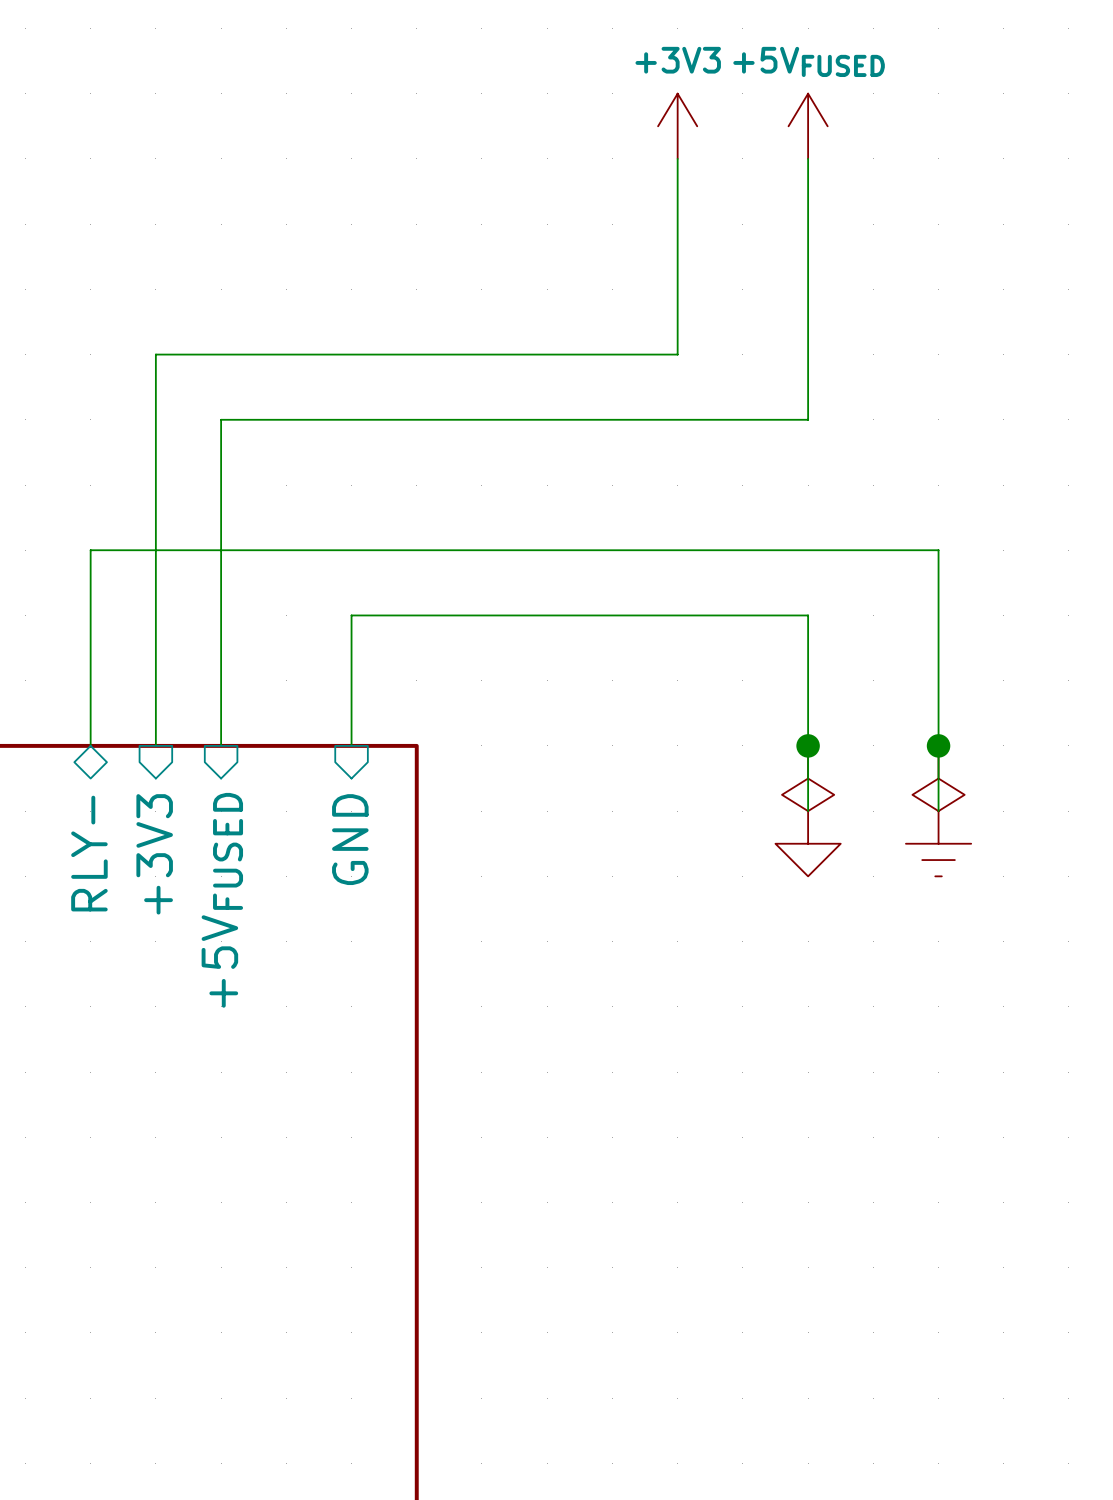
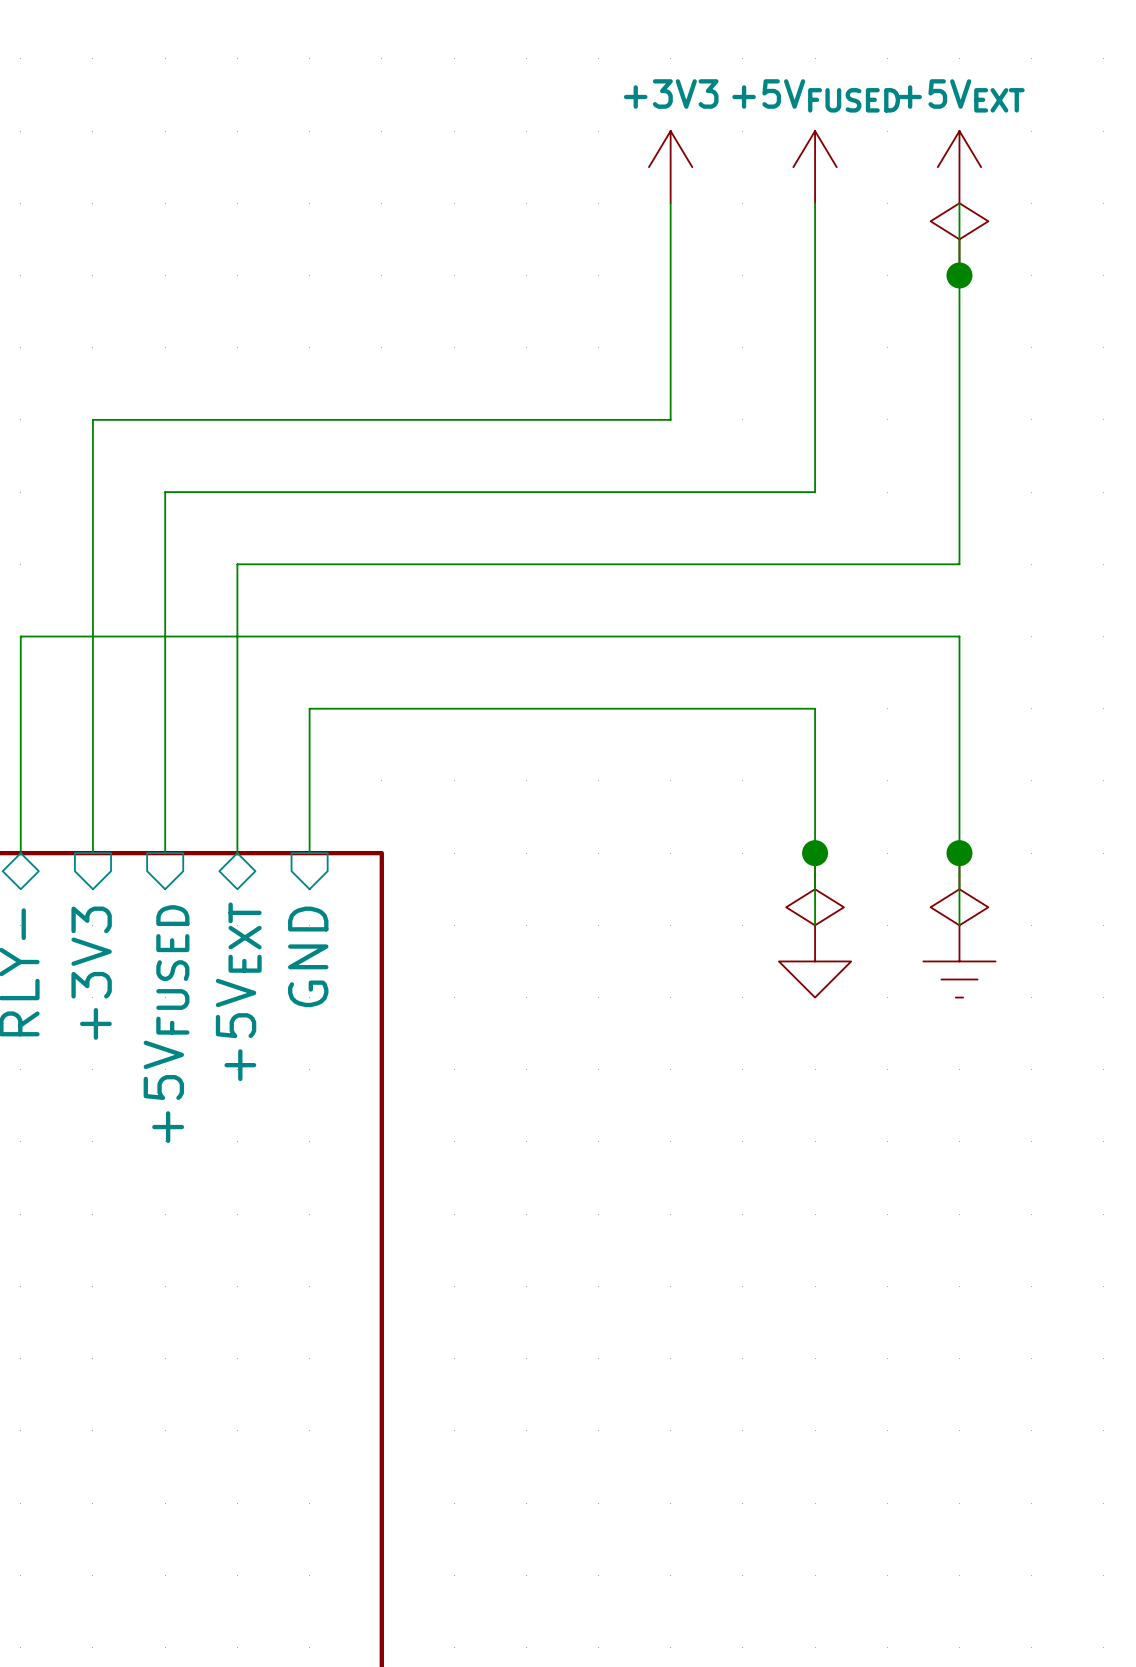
power symbol: none -> +5VEXT (959, 167)
wire: none -> (959, 203) (959, 564) (237, 564) (237, 853)
power symbol: none -> (959, 239)
junction: none -> (959, 275)
sheet pin: none -> +5VEXT (238, 991)

